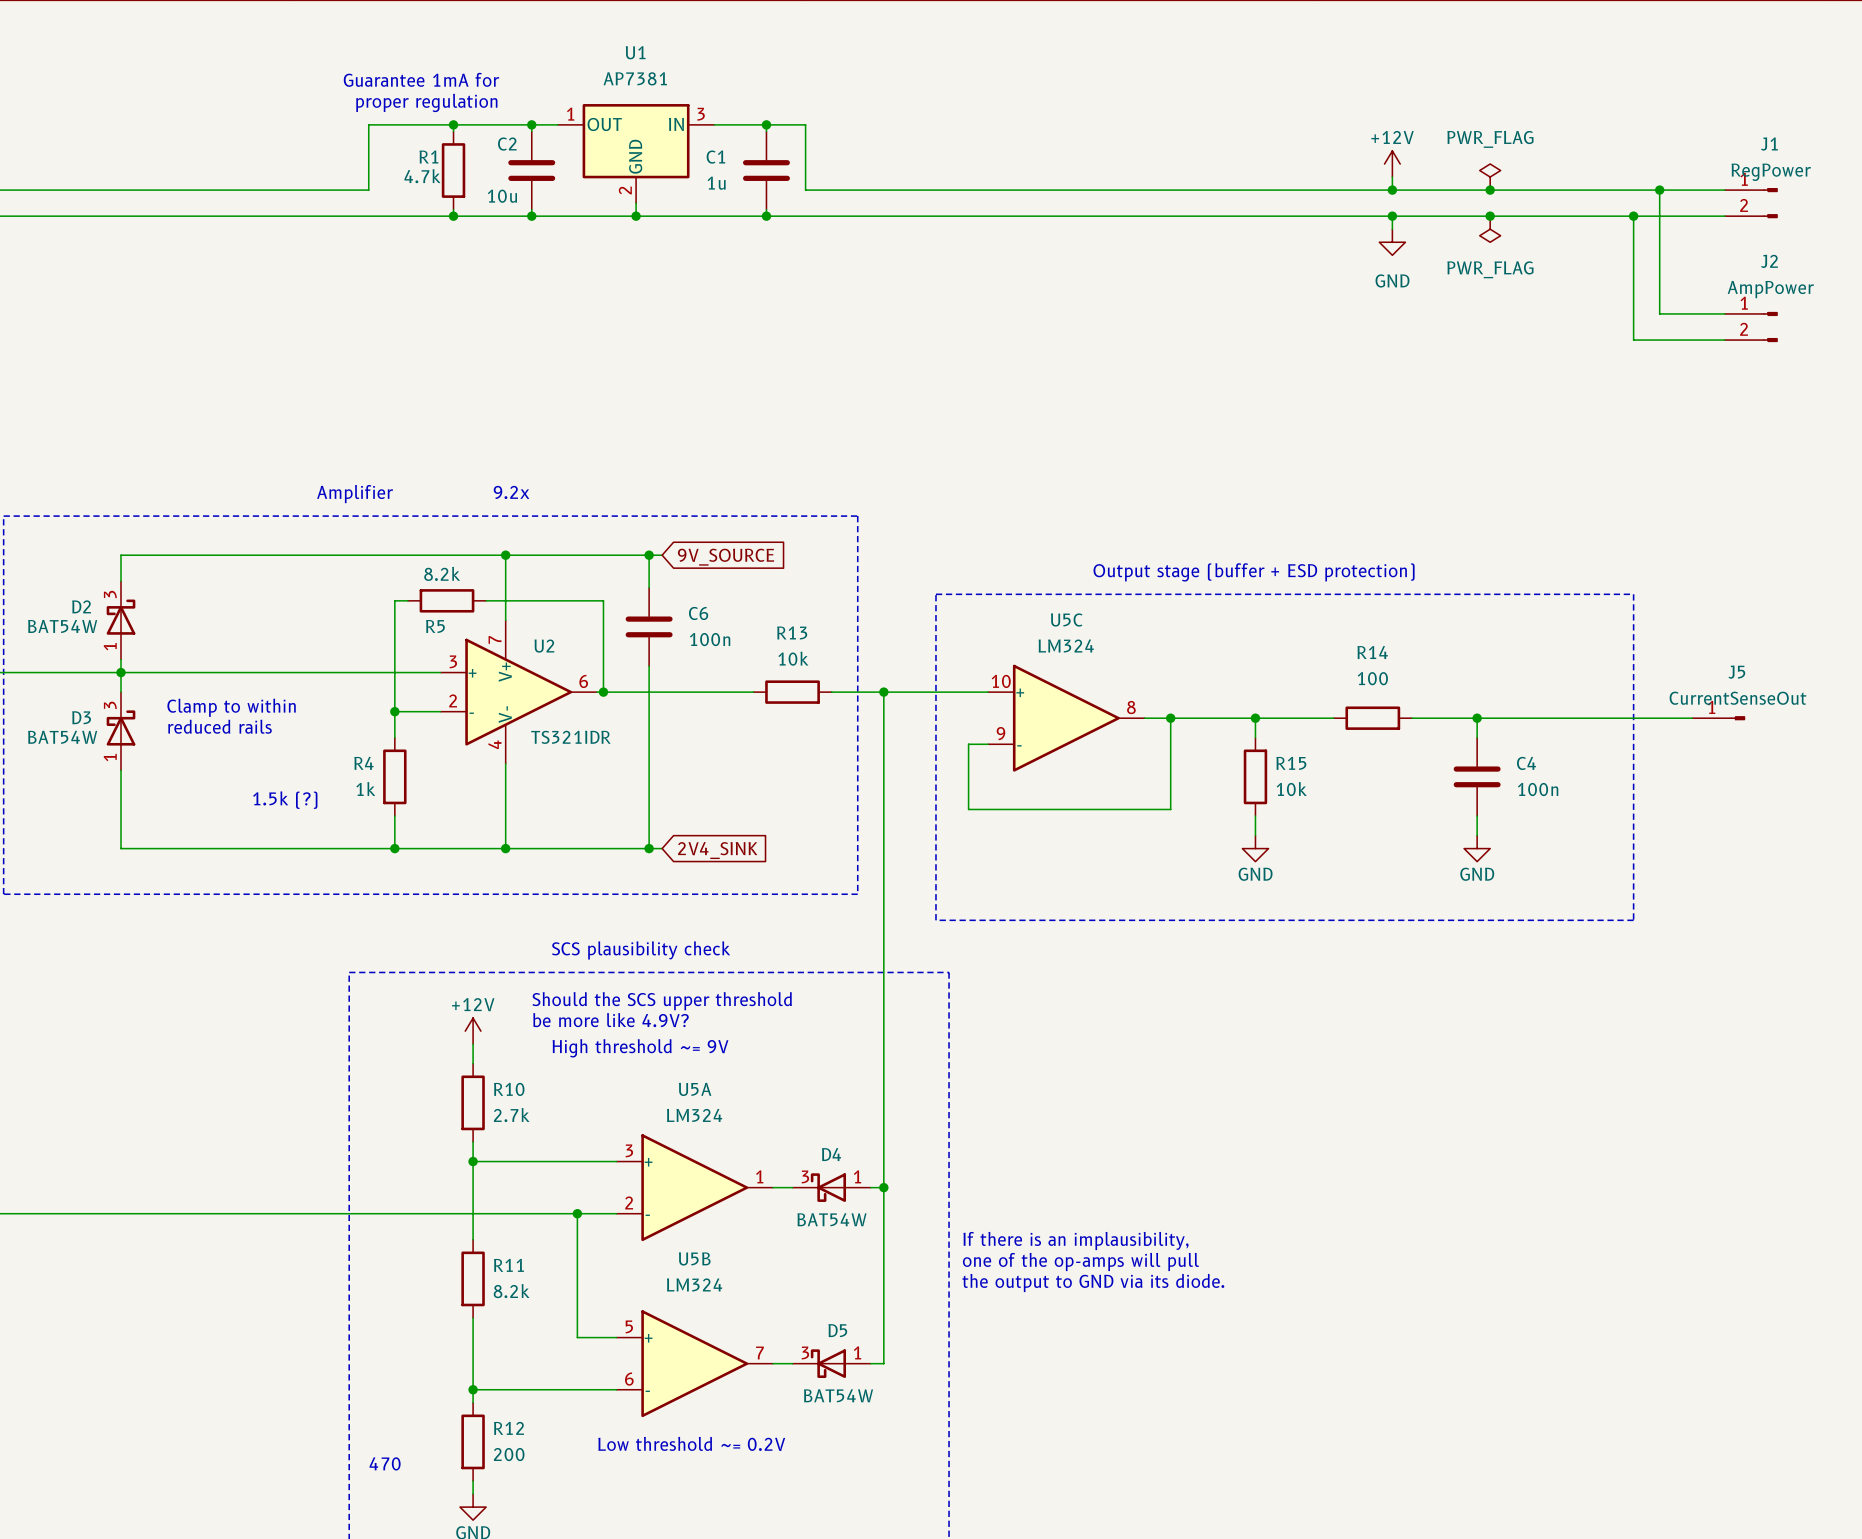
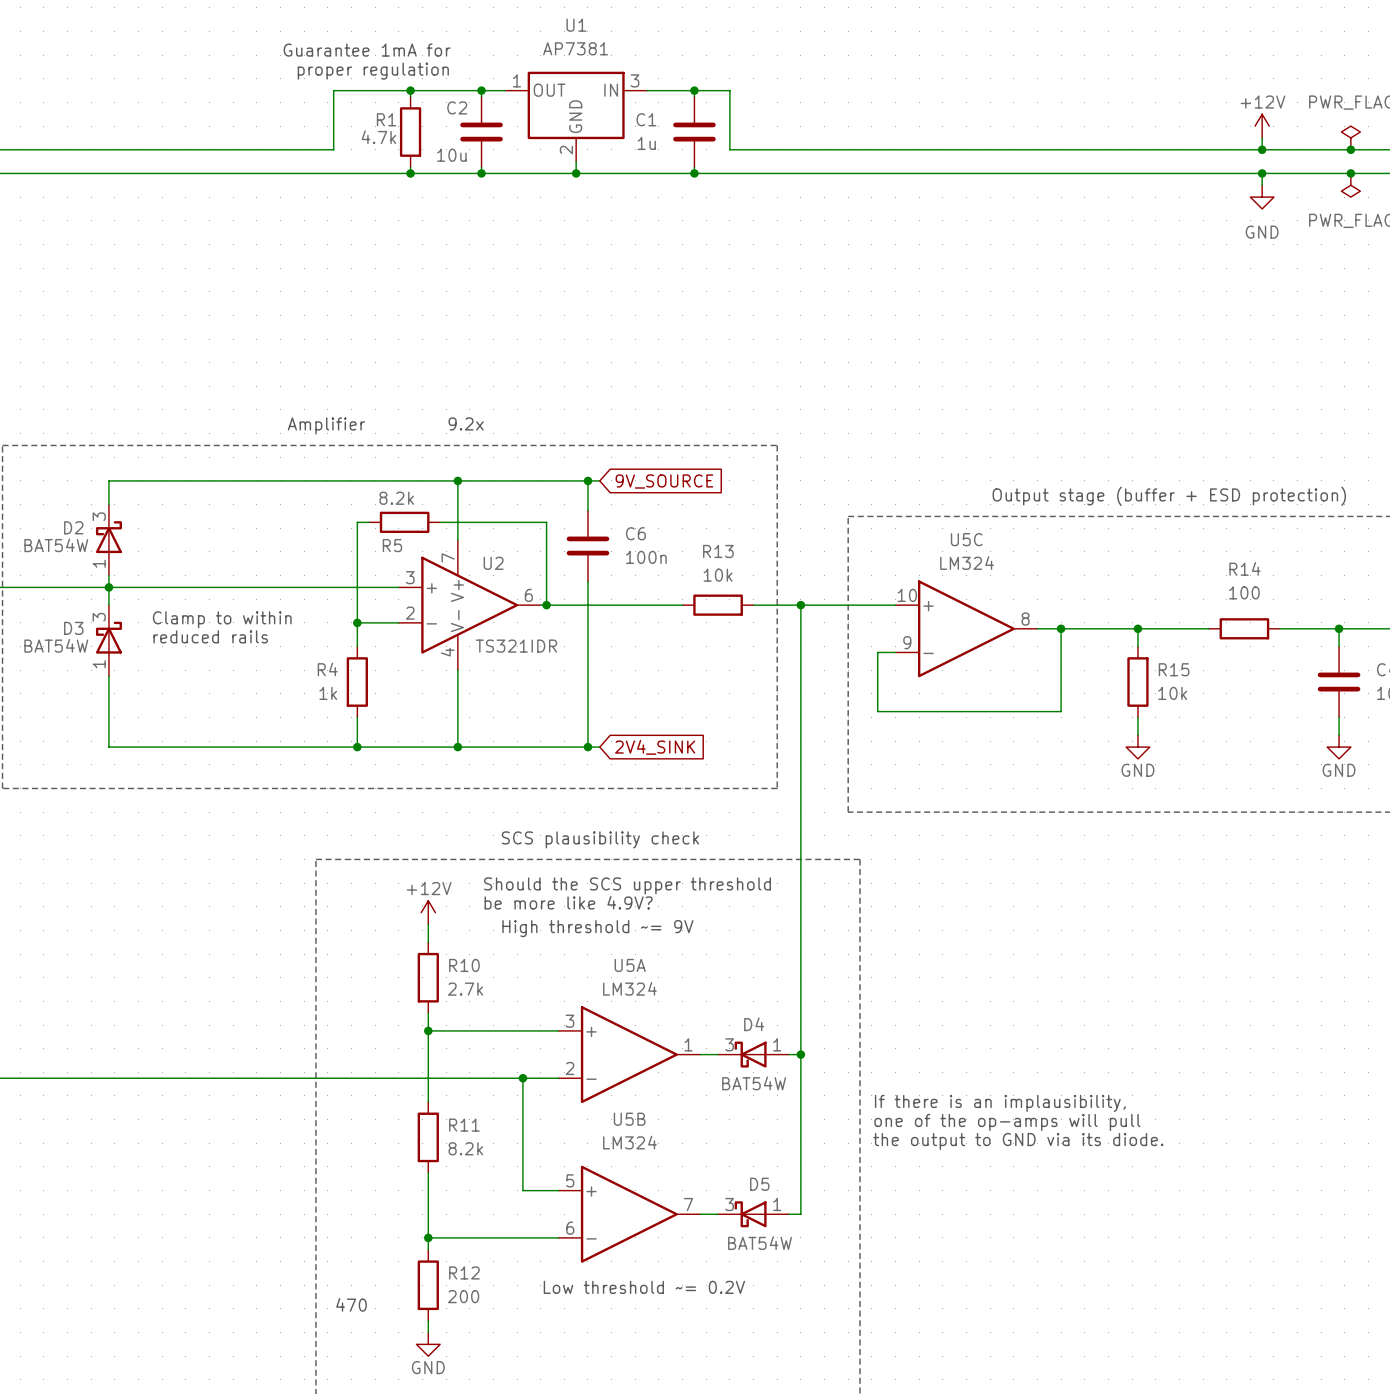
text: 1.5k (?) (285, 800) -> none

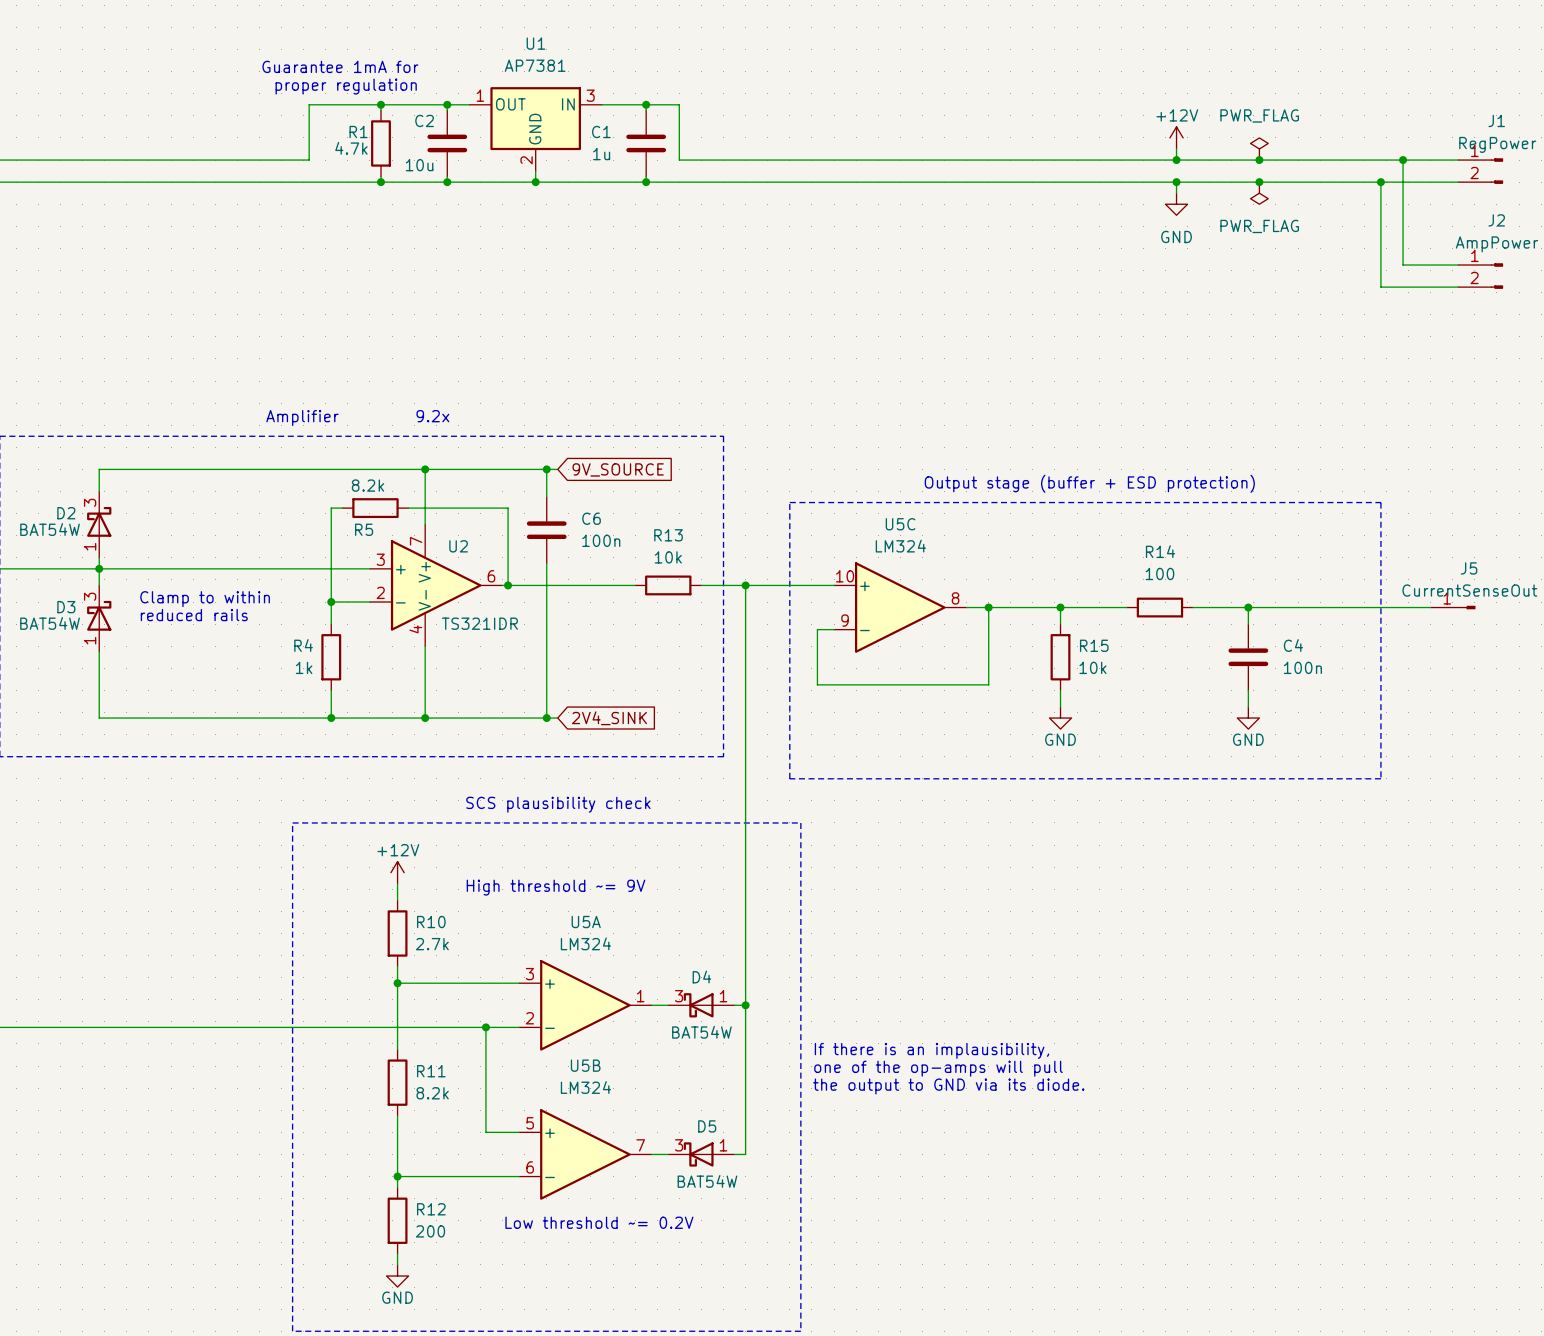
text: Should the SCS upper threshold (627, 885) -> none
text: be more like 4.9V? (568, 902) -> none
text: 470 (351, 1304) -> none

